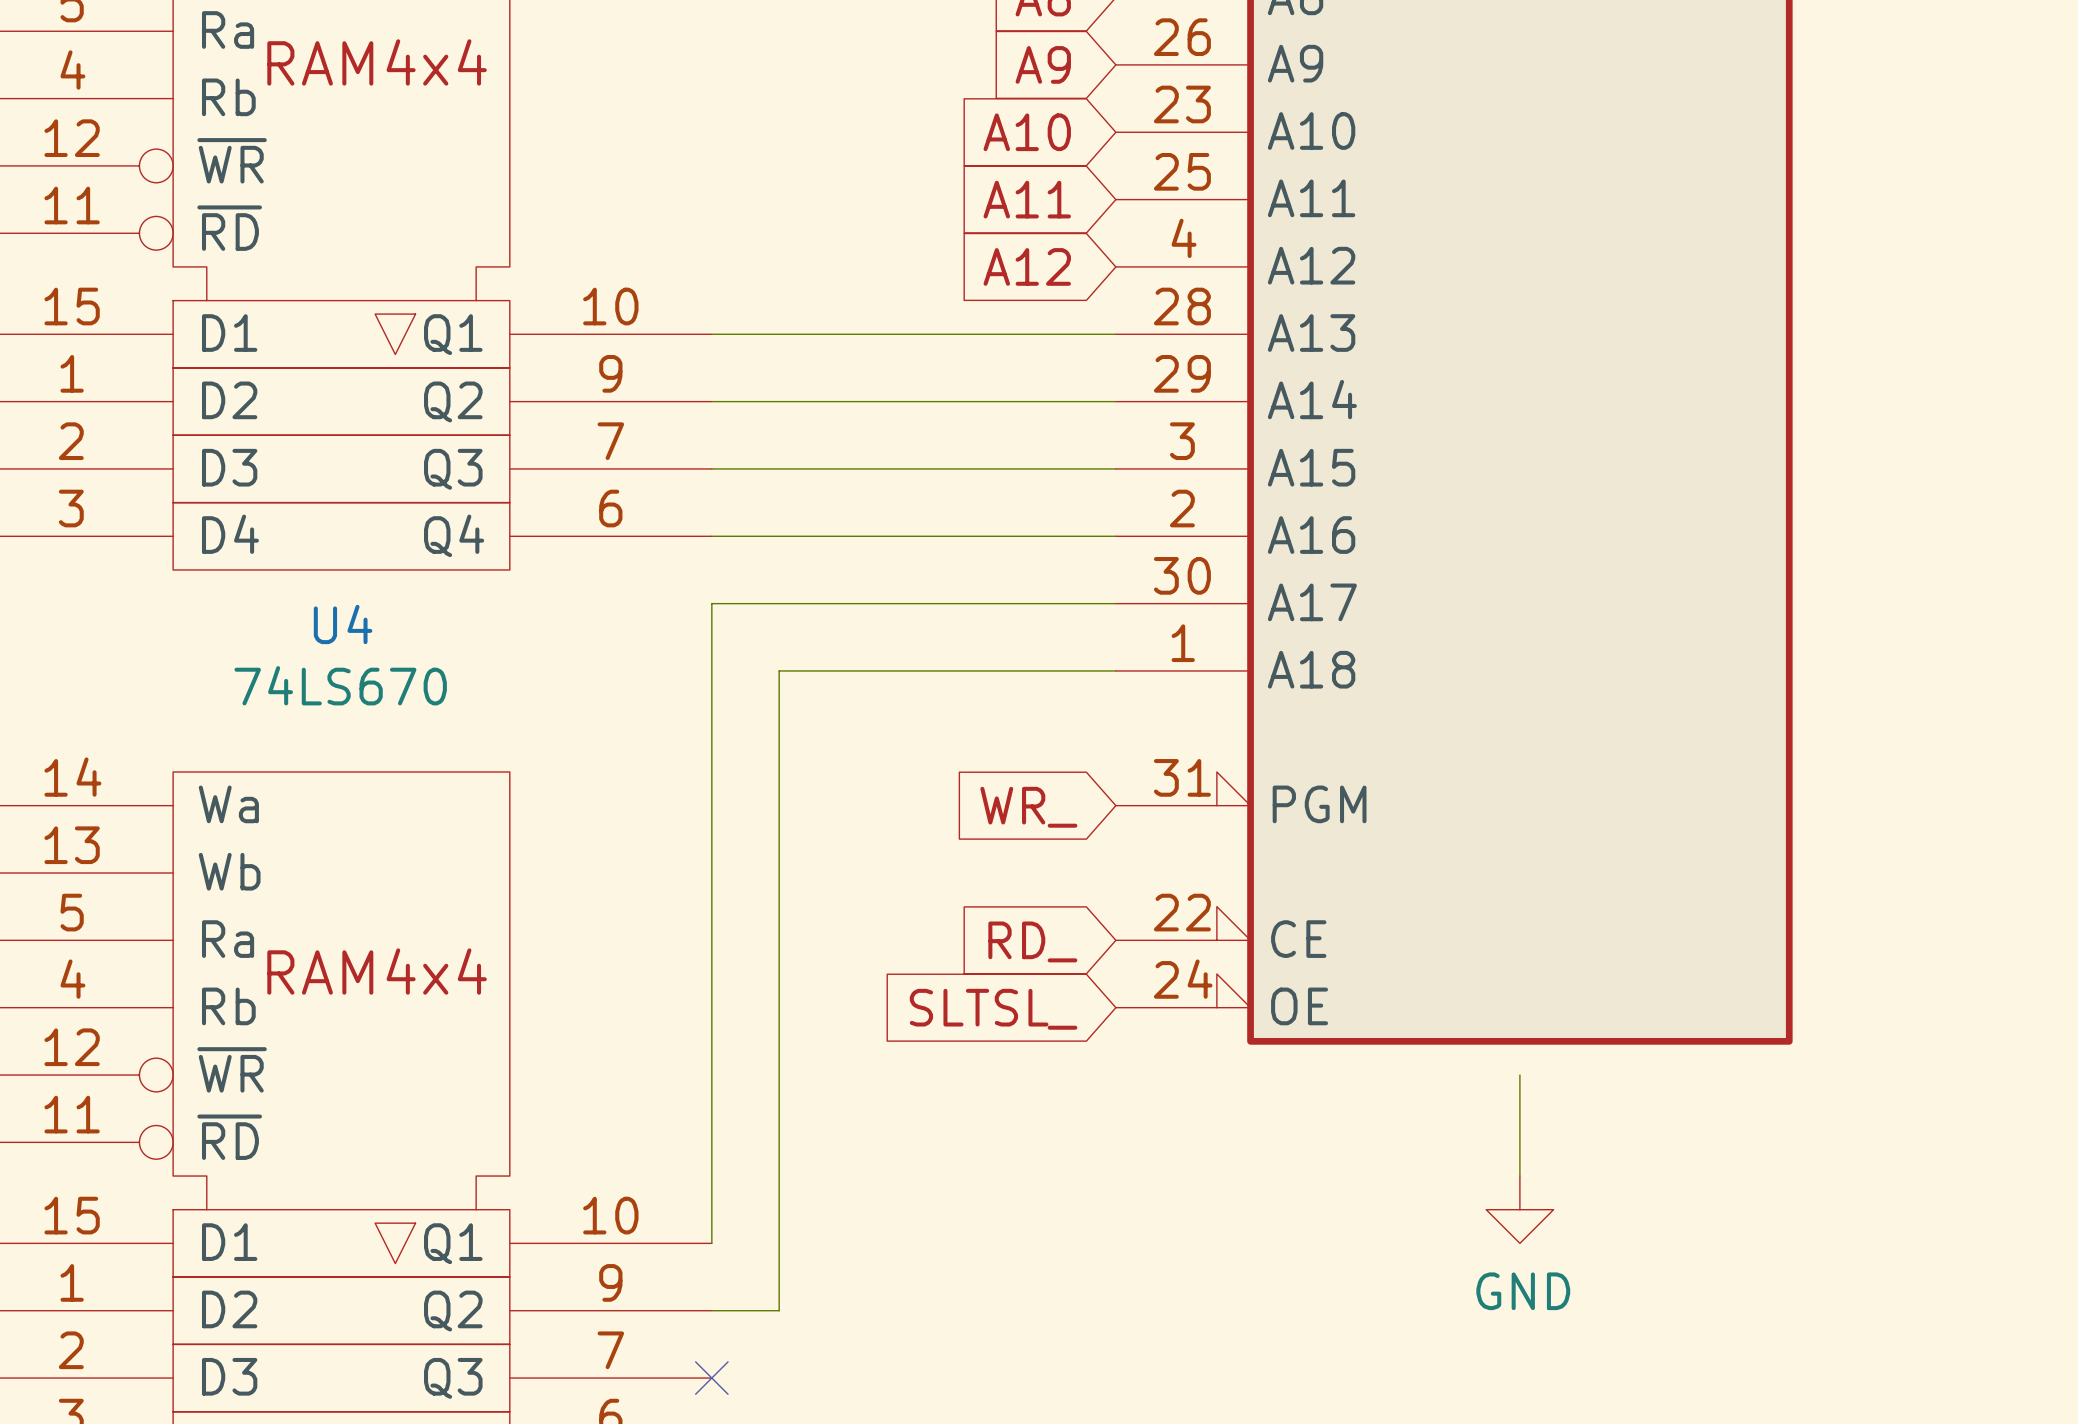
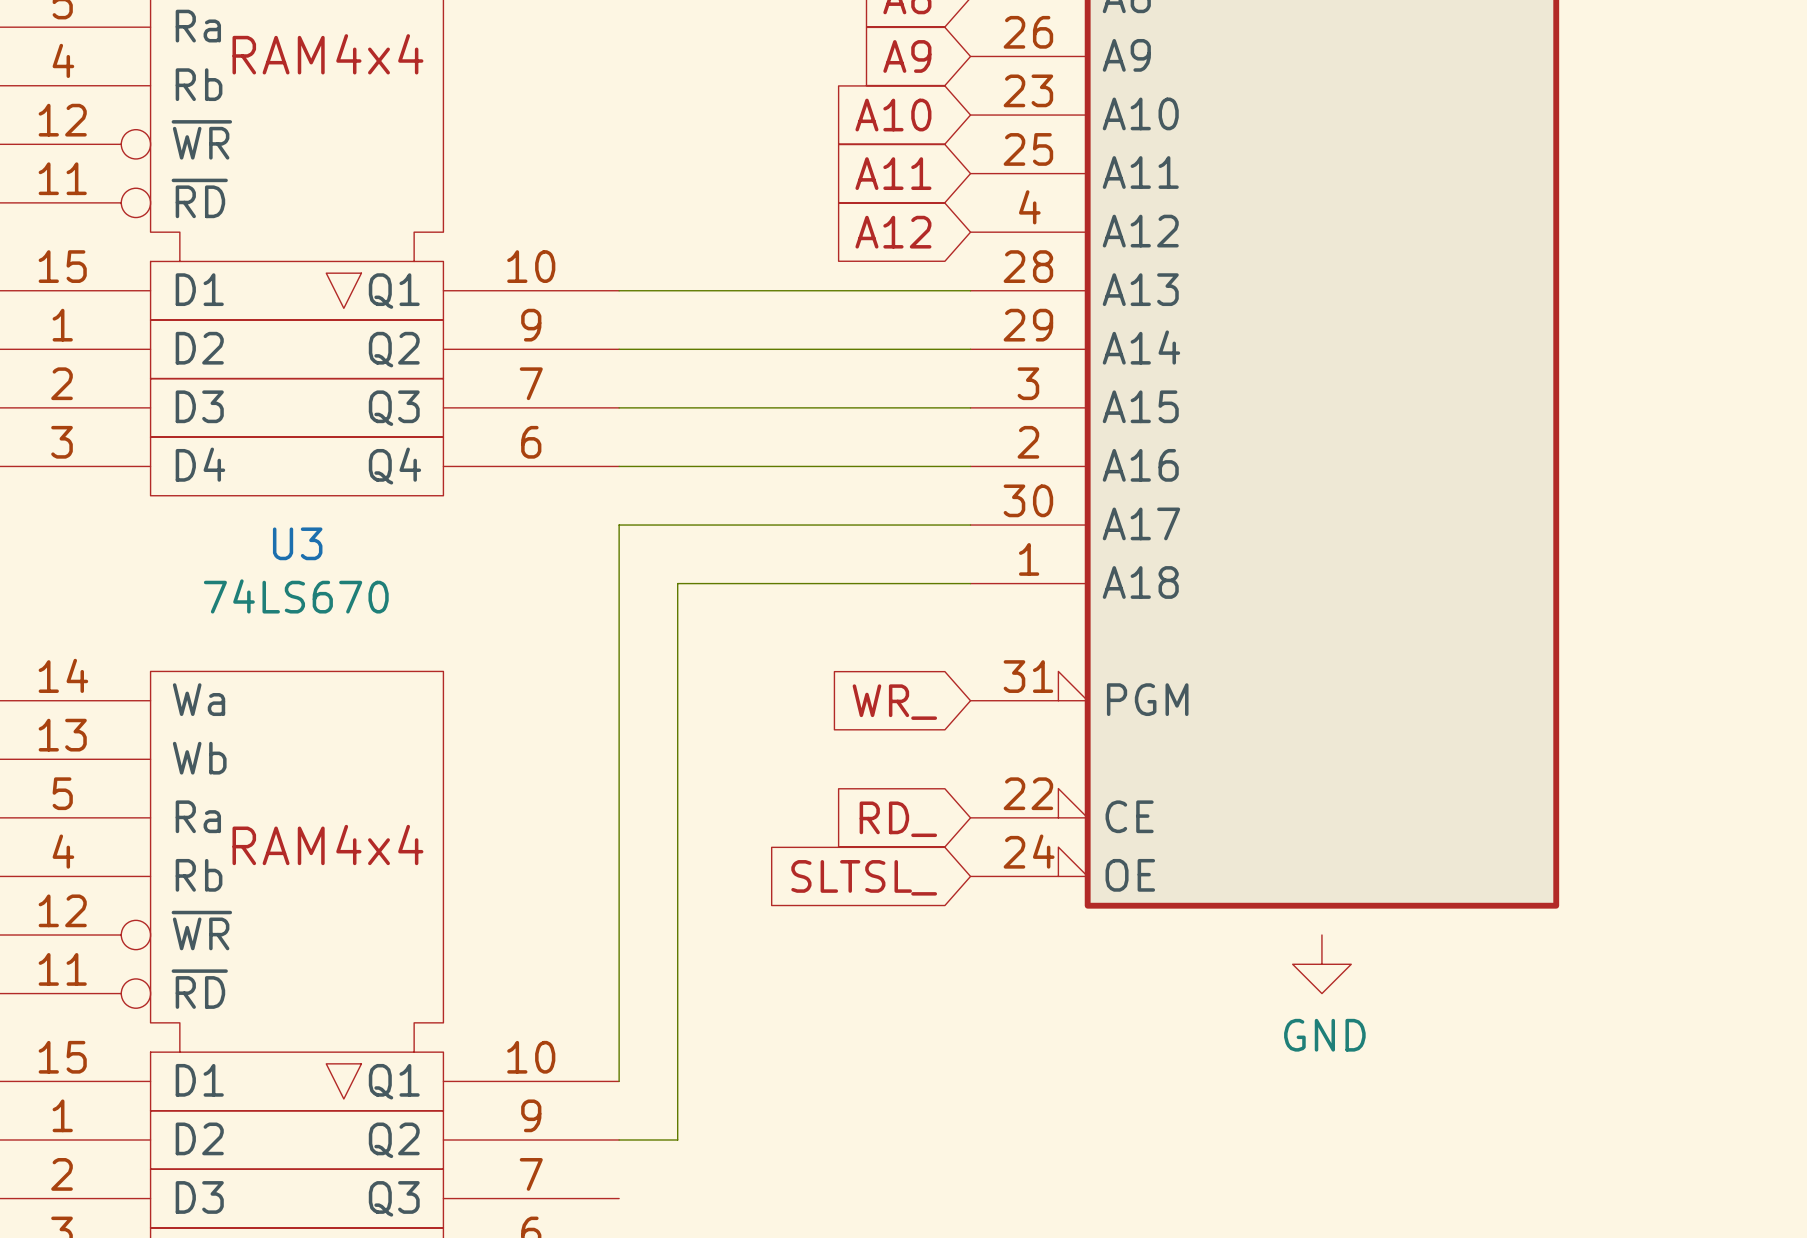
U4 name: U4 (343, 624) -> U3 (297, 543)
wire: (1519, 1075) (1519, 1176) -> none
power symbol position: GND (1519, 1209) -> GND (1321, 964)
no-connect mark: (711, 1378) -> none

